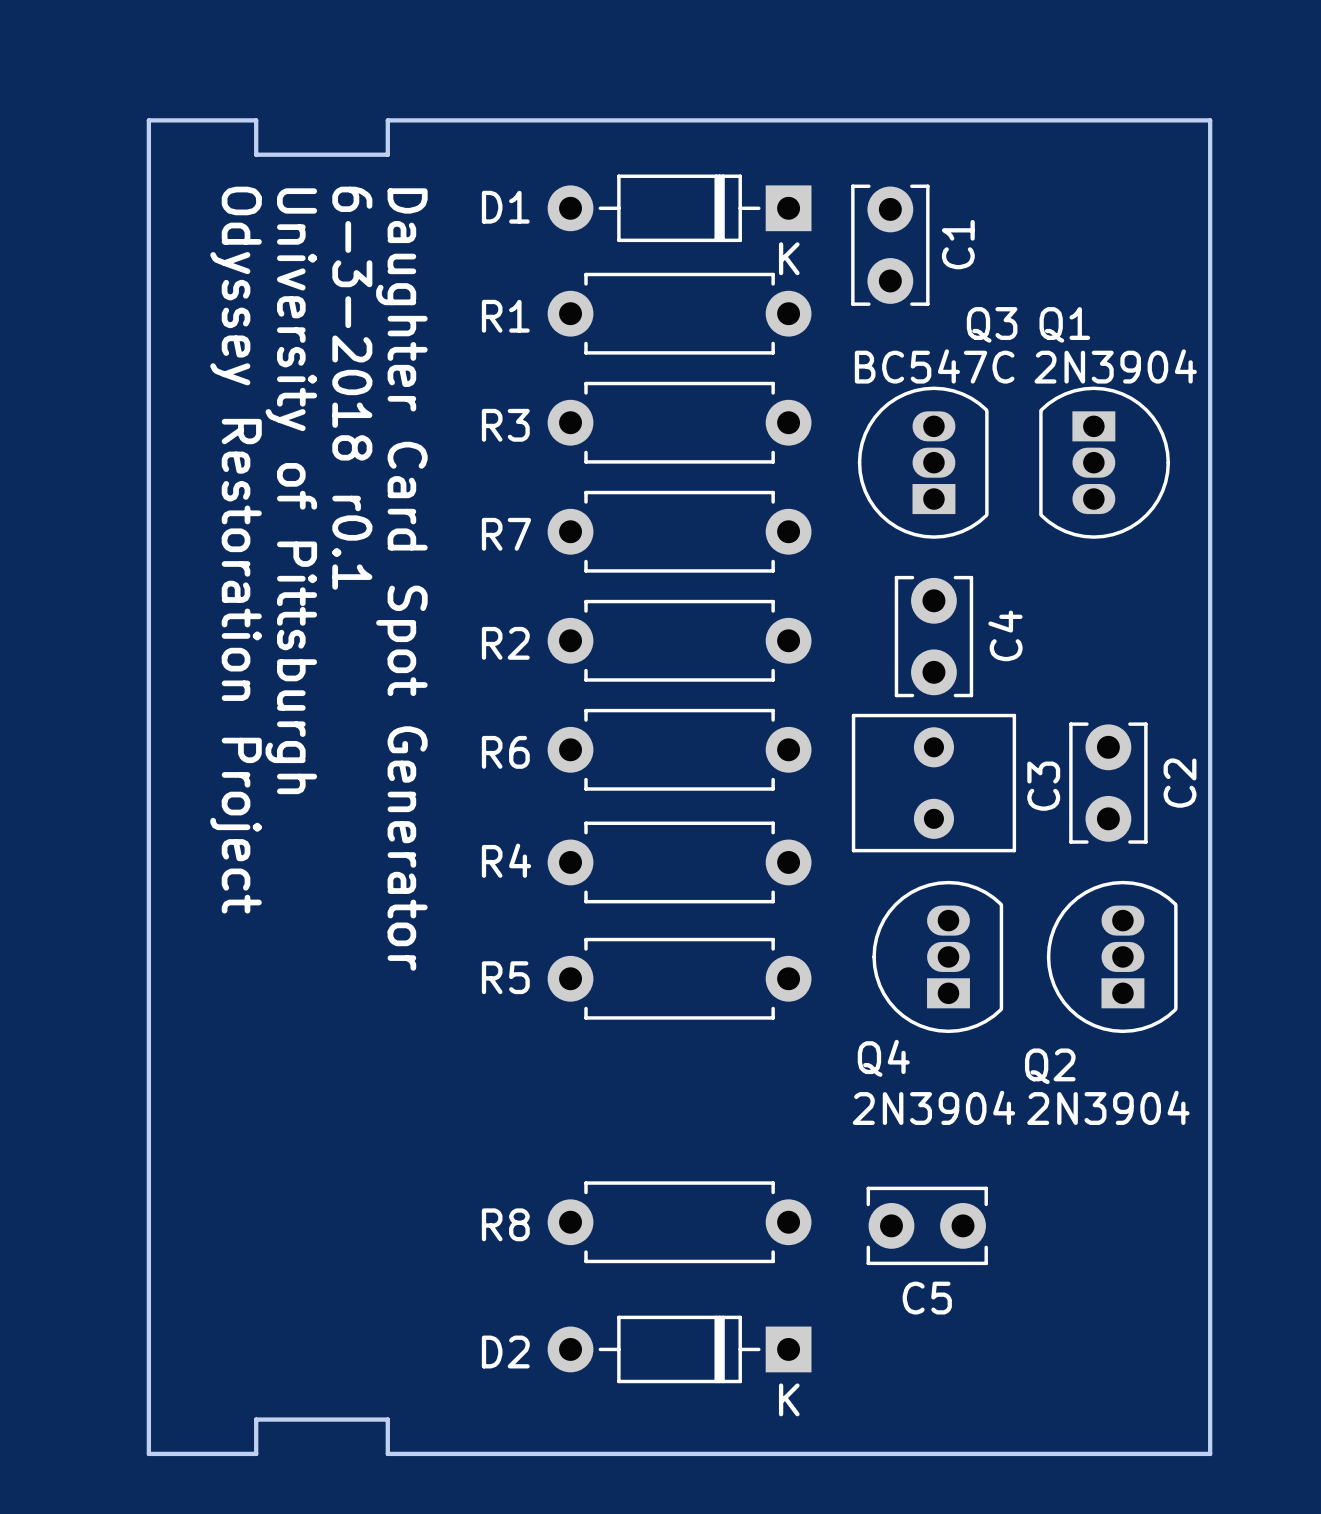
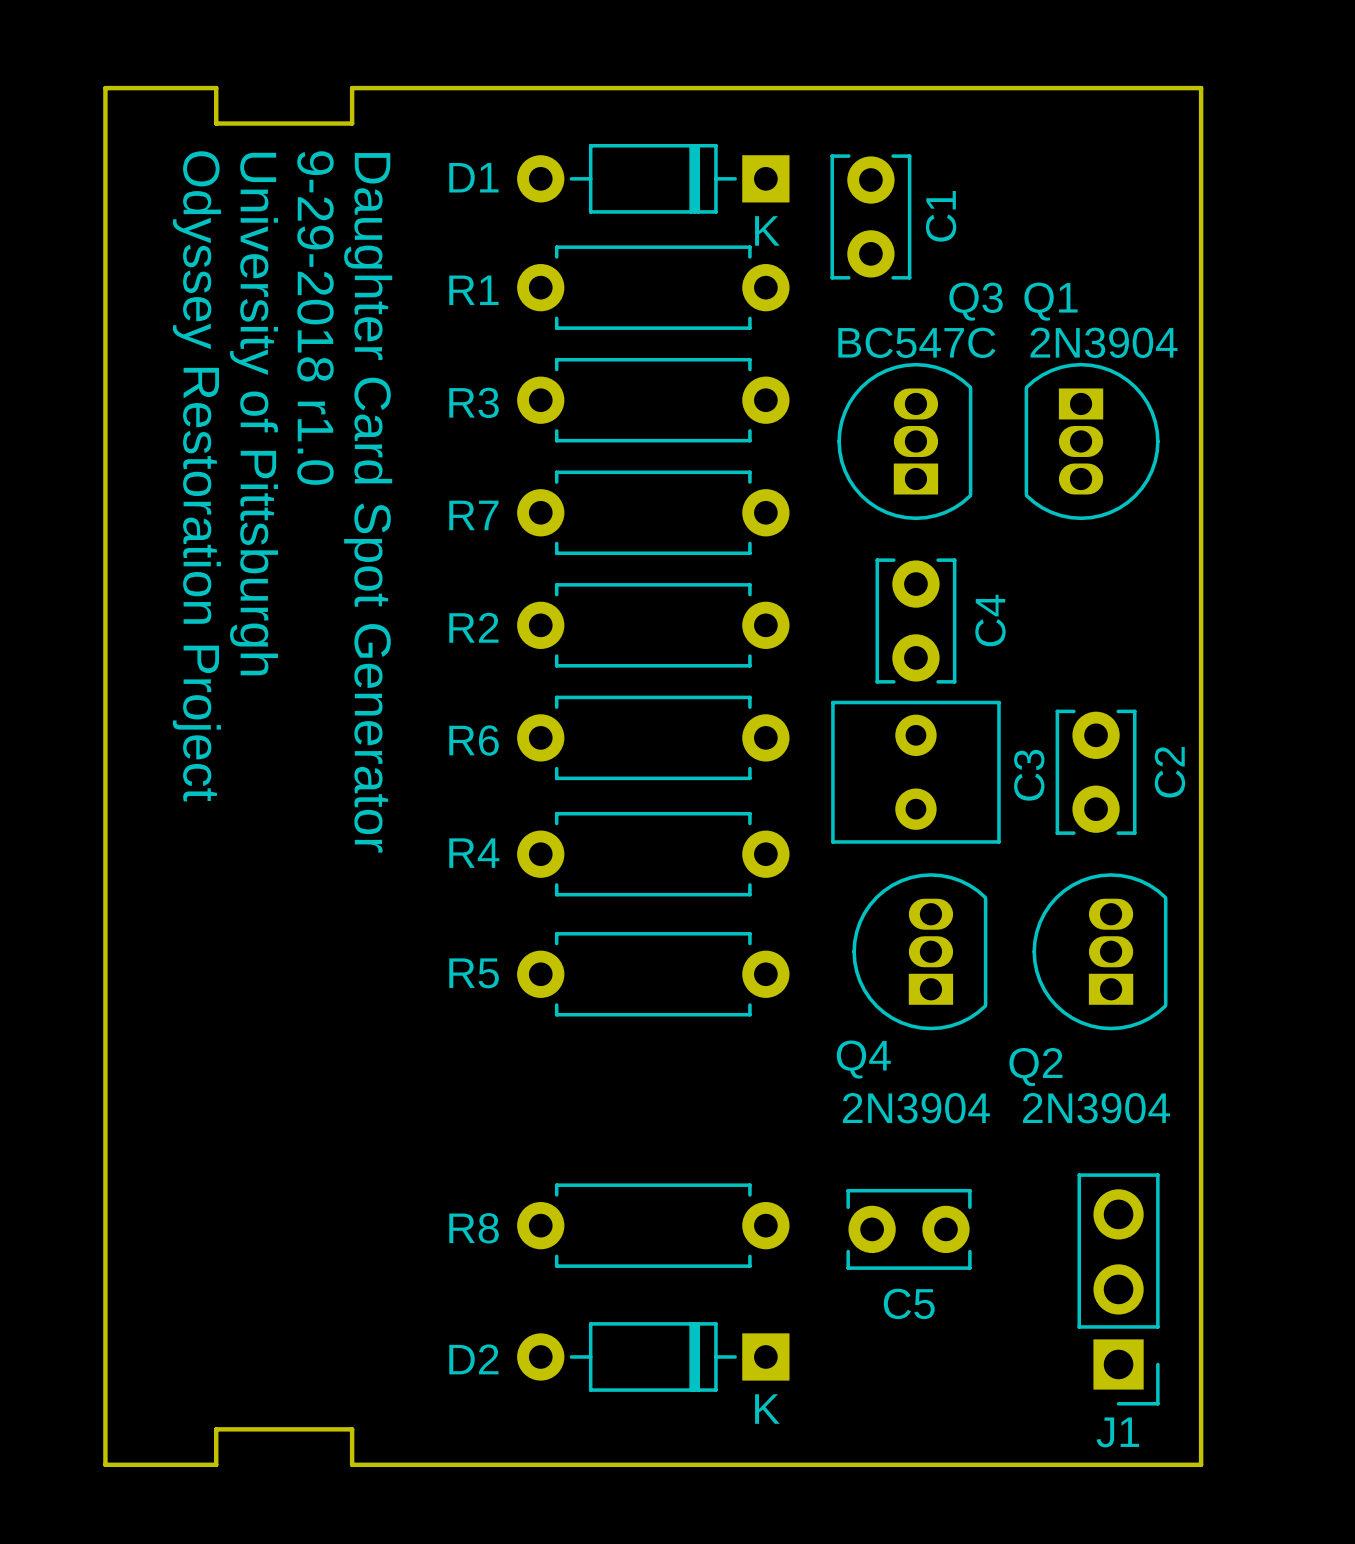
text: 6-3-2018 r0.1 (352, 388) -> 9-29-2018 r1.0 (315, 318)
J1: none -> (1118, 1289)

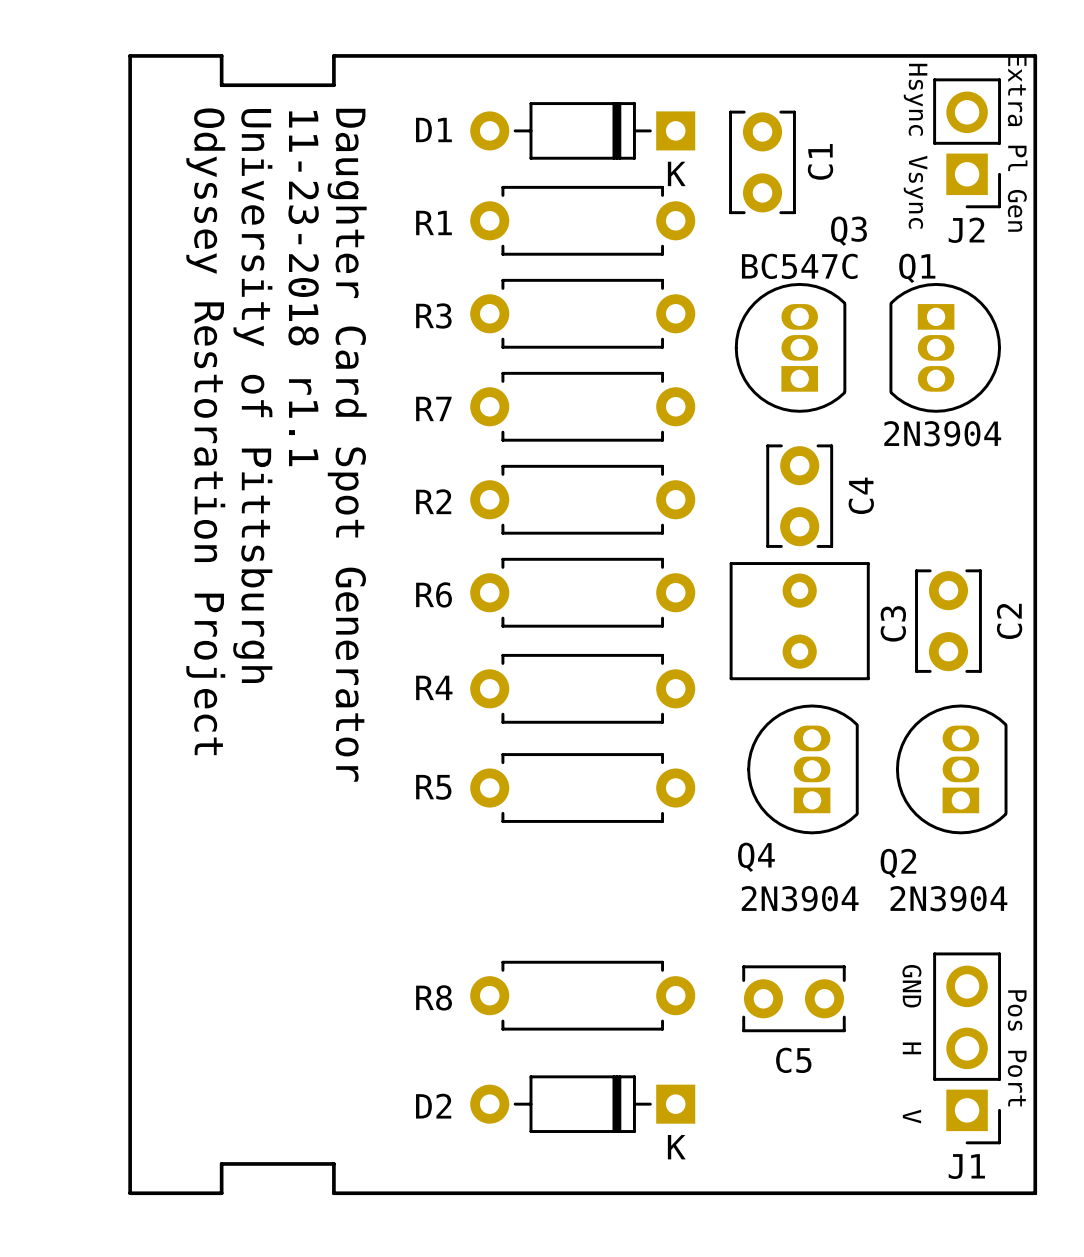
text: none -> Hsync (915, 99)
J2: none -> (967, 143)
text: none -> Extra Pl Gen (1017, 143)
text: none -> Vsync (915, 192)
Q1 name position: Q1 (1050, 301) -> Q1 (917, 268)
text: 9-29-2018 r1.0 (315, 318) -> 11-23-2018 r1.1 (303, 288)
Q1 value position: 2N3904 (1104, 342) -> 2N3904 (942, 433)
text: none -> GND (911, 986)
text: none -> H (911, 1048)
text: none -> Pos Port (1017, 1048)
text: none -> V (911, 1116)

